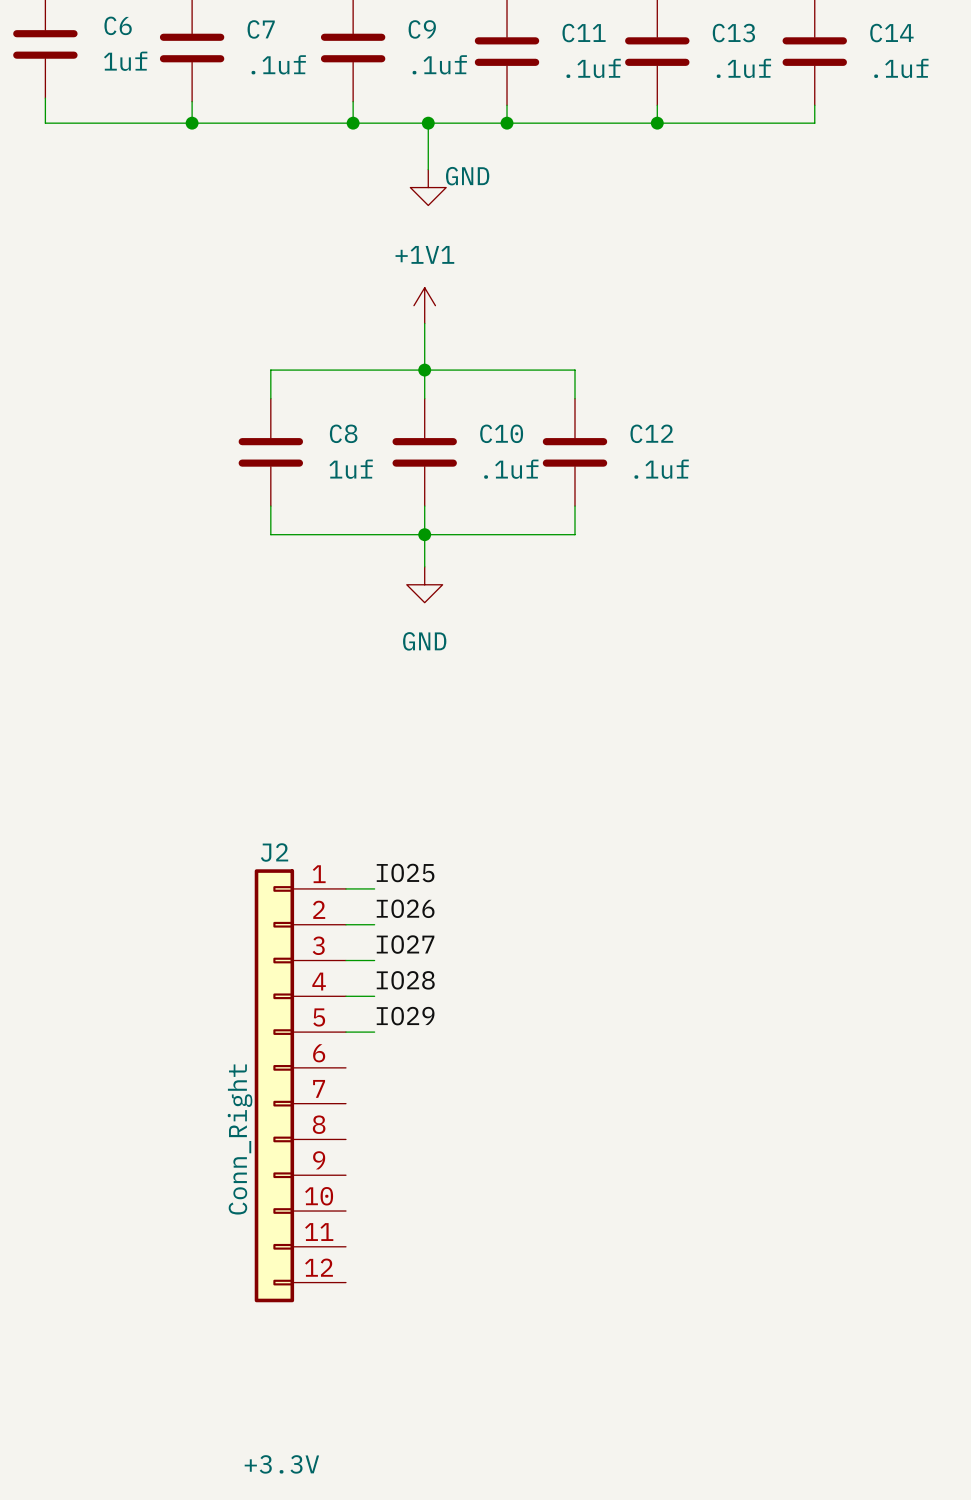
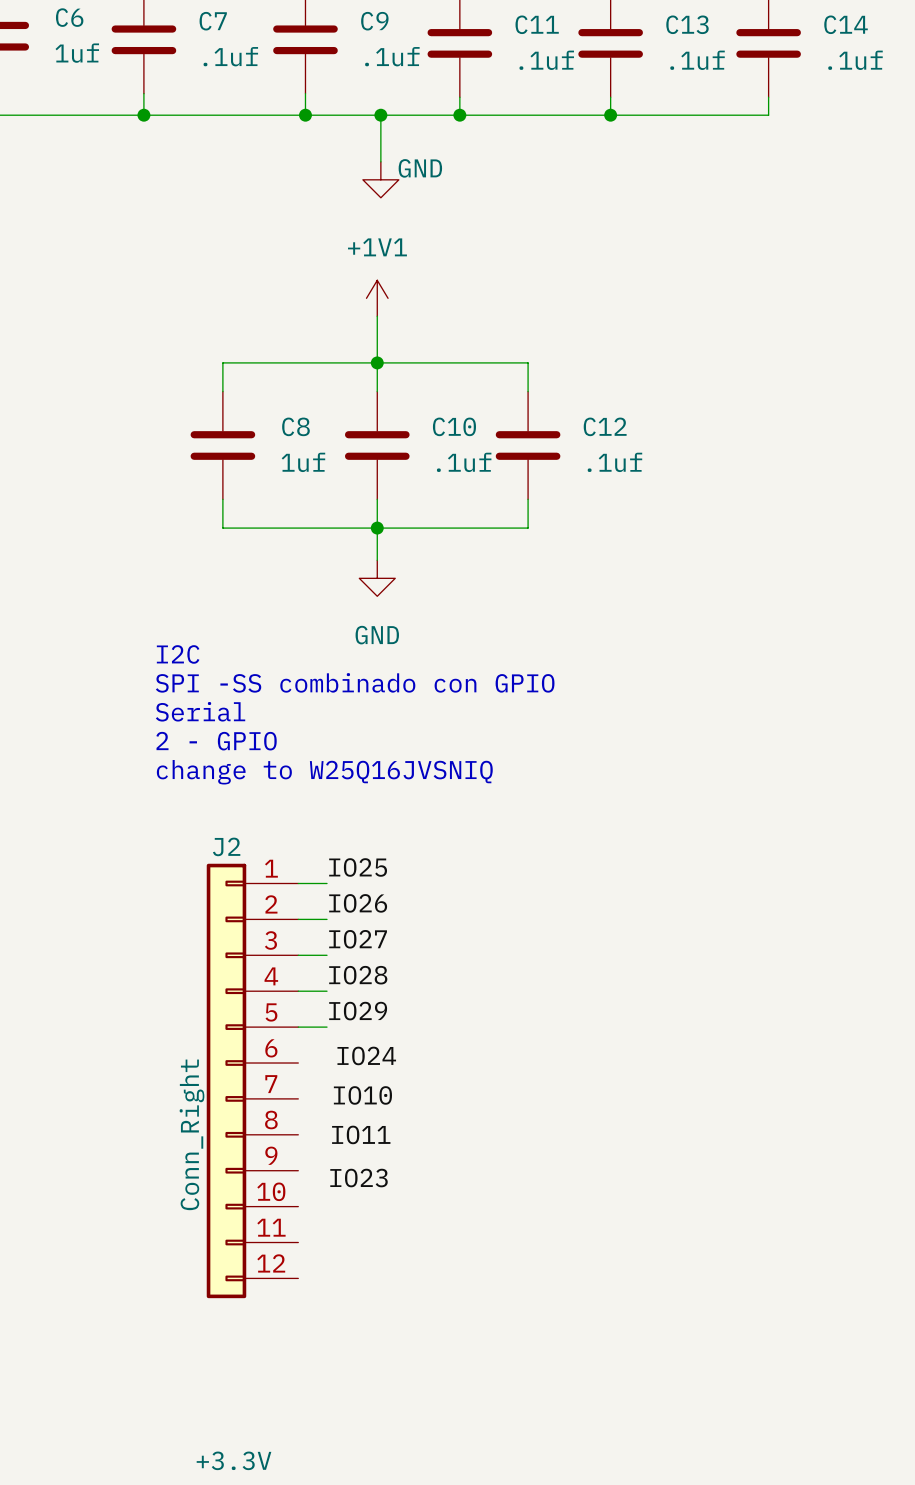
text: none -> I2C (178, 654)
text: none -> SPI -SS combinado con GPIO (355, 682)
text: none -> Serial (200, 711)
text: none -> 2 - GPIO (216, 741)
text: none -> change to W25Q16JVSNIQ (324, 772)
label: none -> IO24 (366, 1055)
label: none -> IO10 (362, 1095)
label: none -> IO11 (361, 1134)
label: none -> IO23 (359, 1178)

